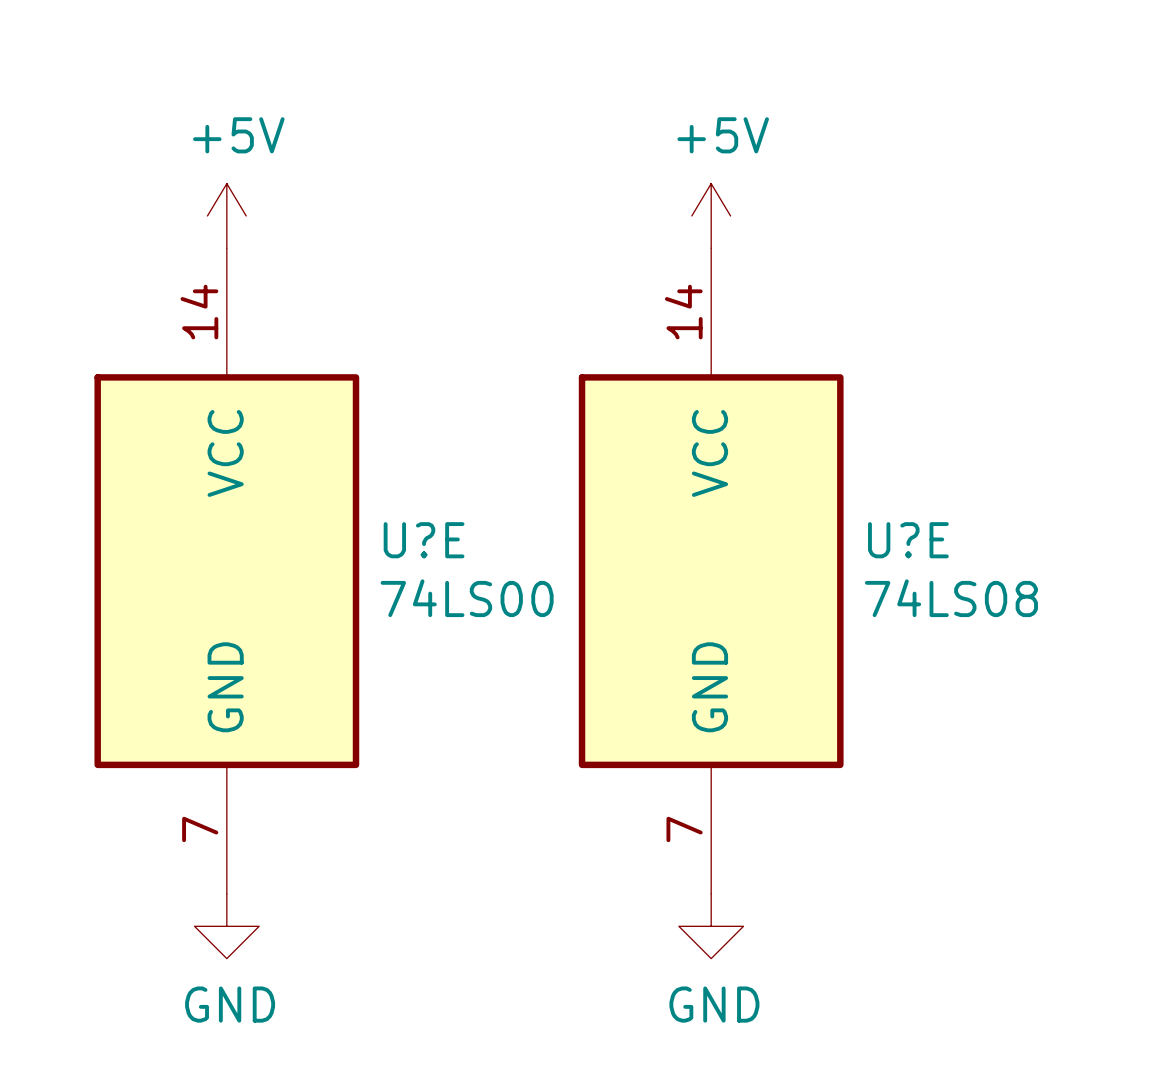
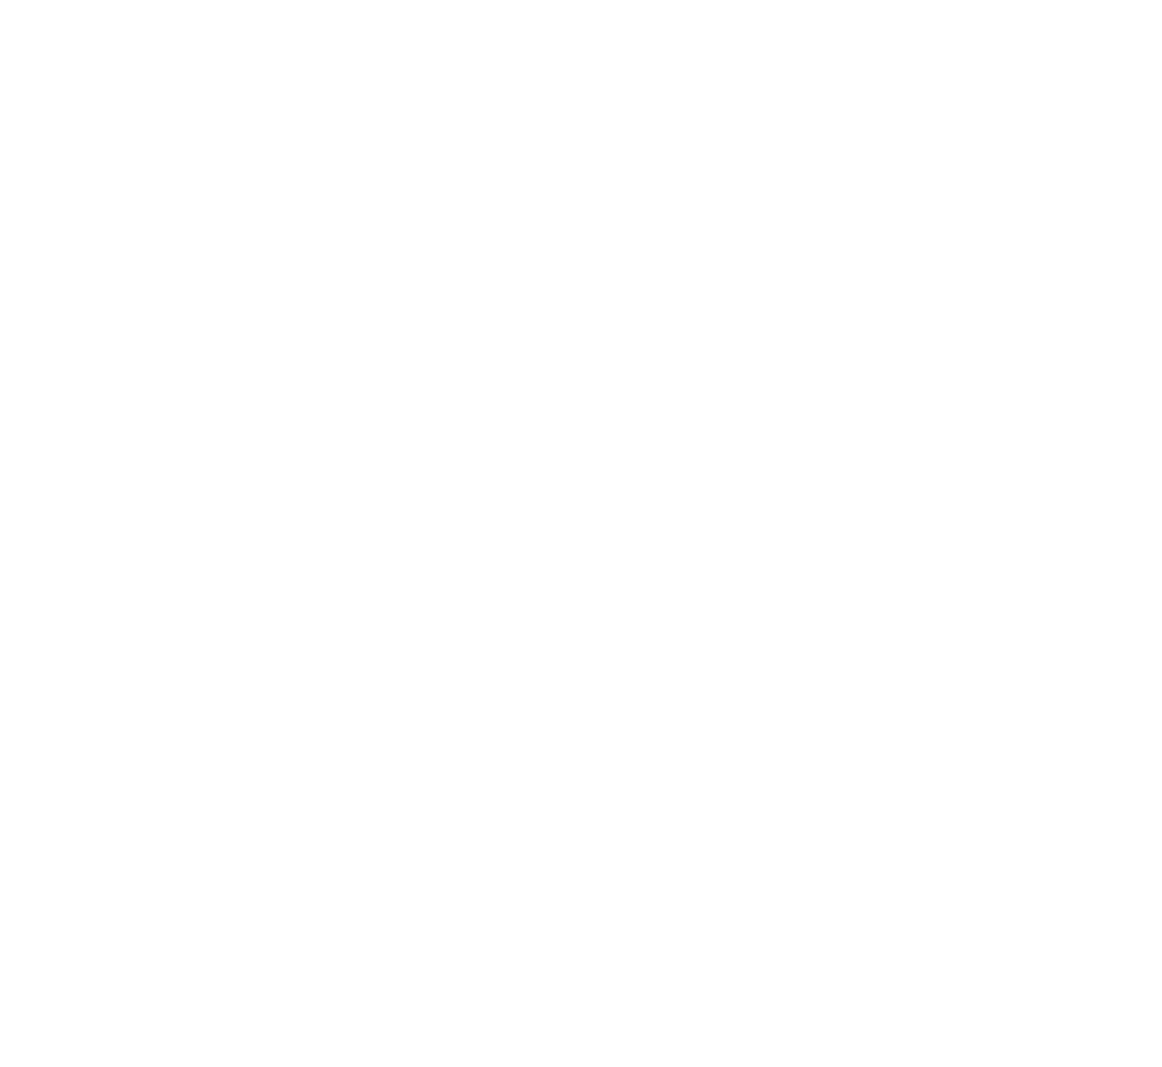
power symbol: +5V (226, 215) -> none
power symbol: +5V (711, 215) -> none
U?E: 74LS00 (226, 571) -> none
U?E: 74LS08 (711, 571) -> none
power symbol: GND (226, 926) -> none
power symbol: GND (711, 926) -> none

